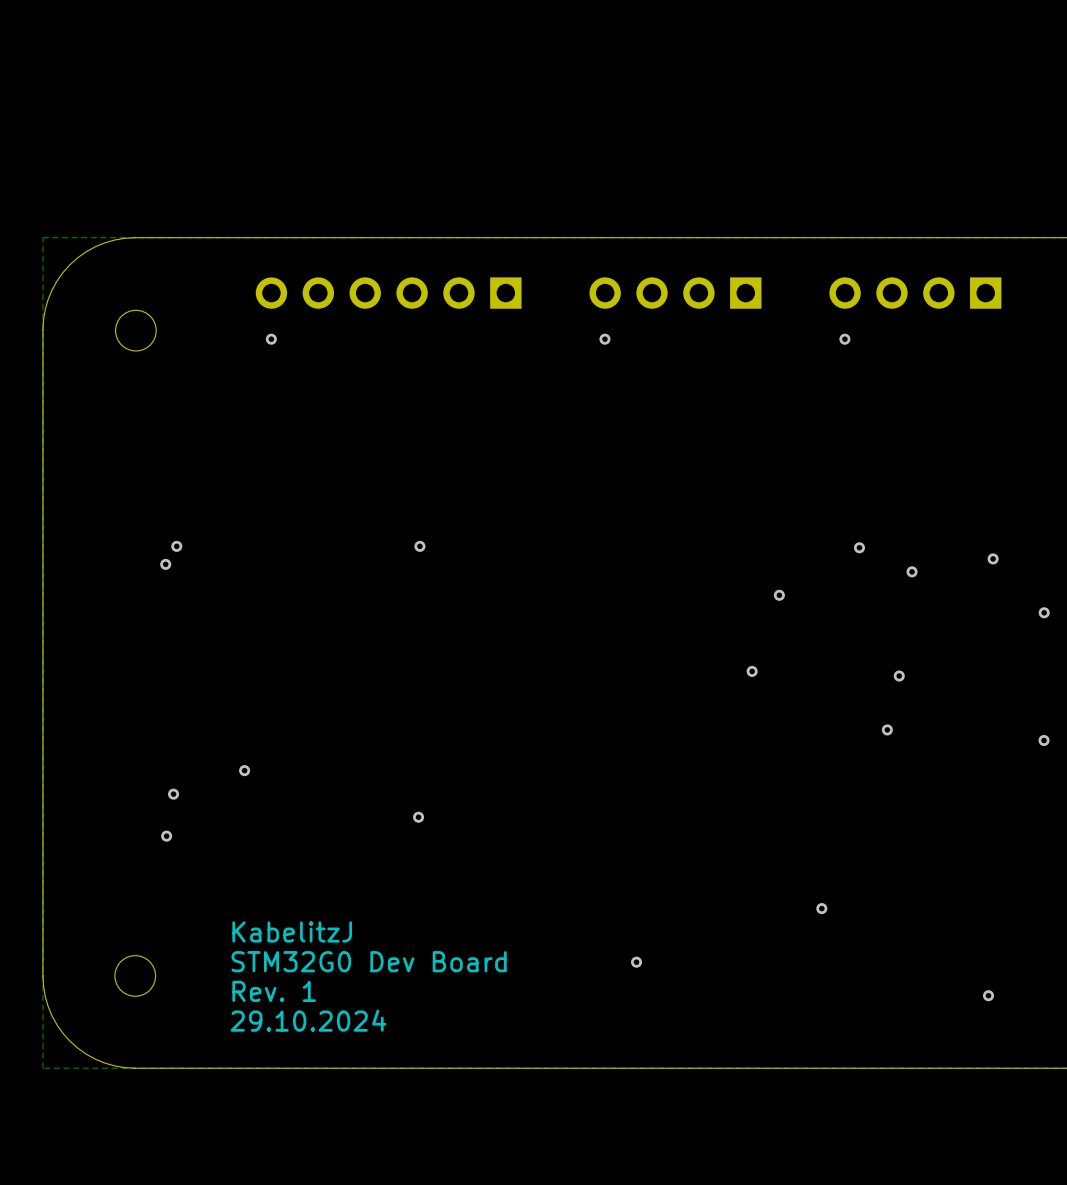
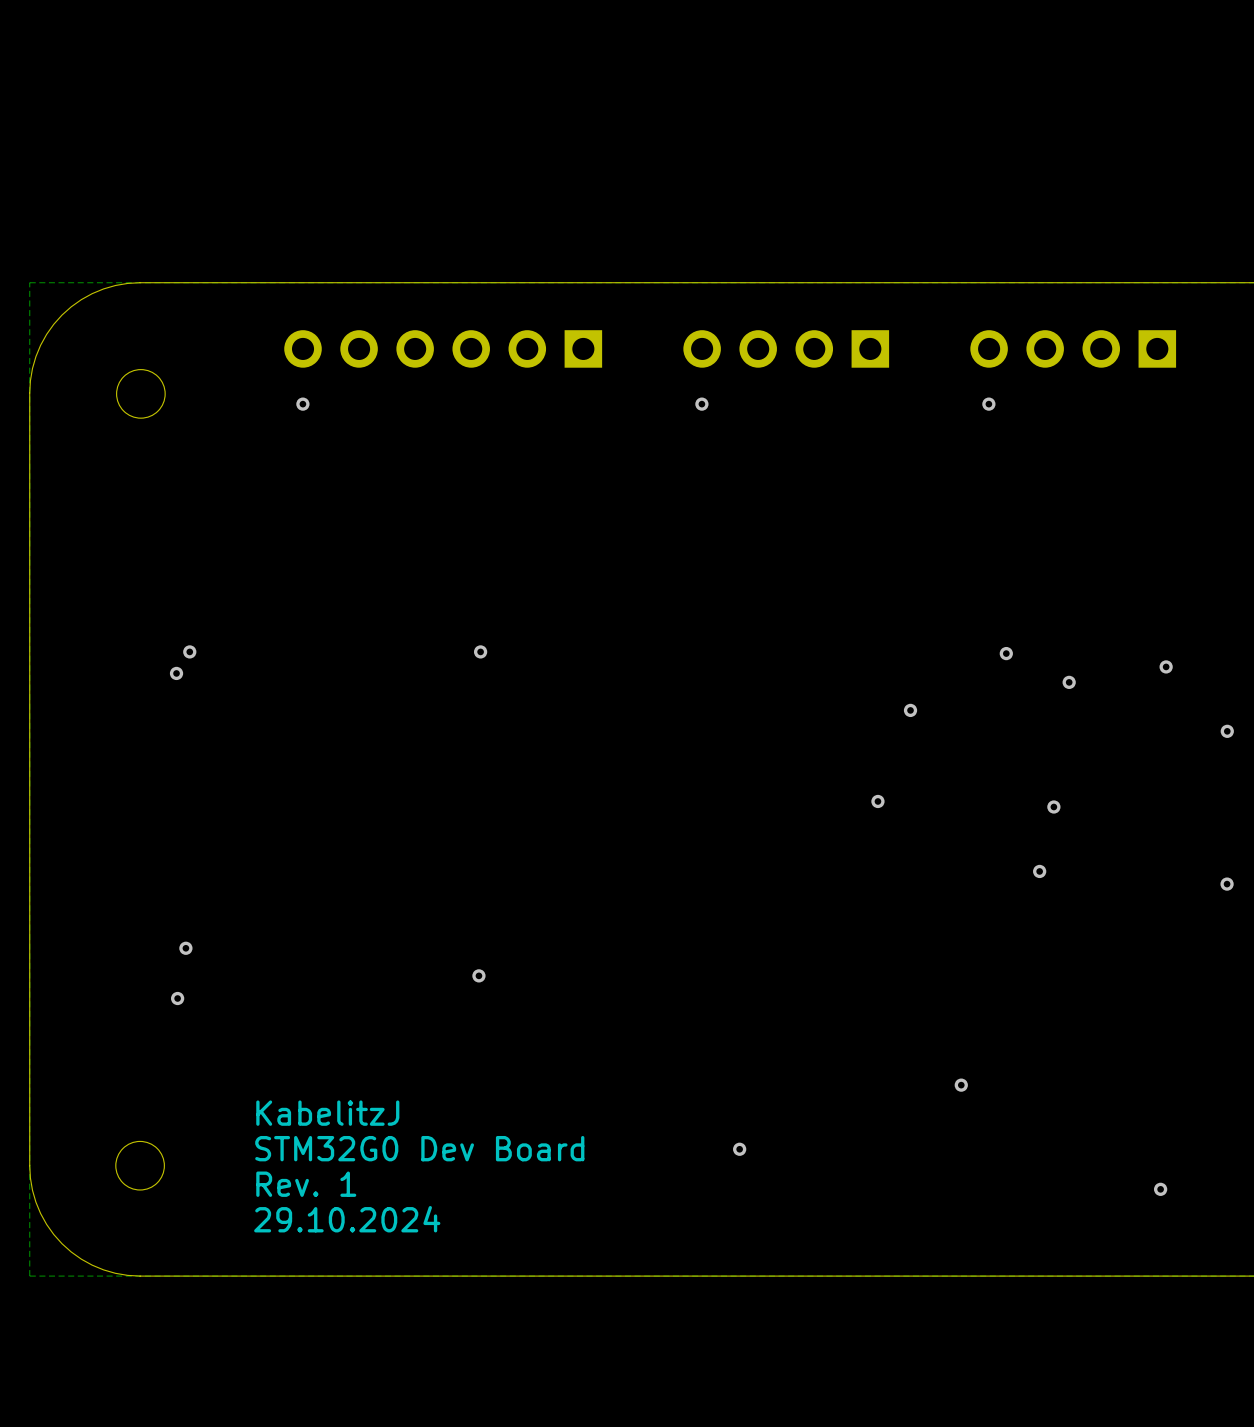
via: (244, 770) -> none

